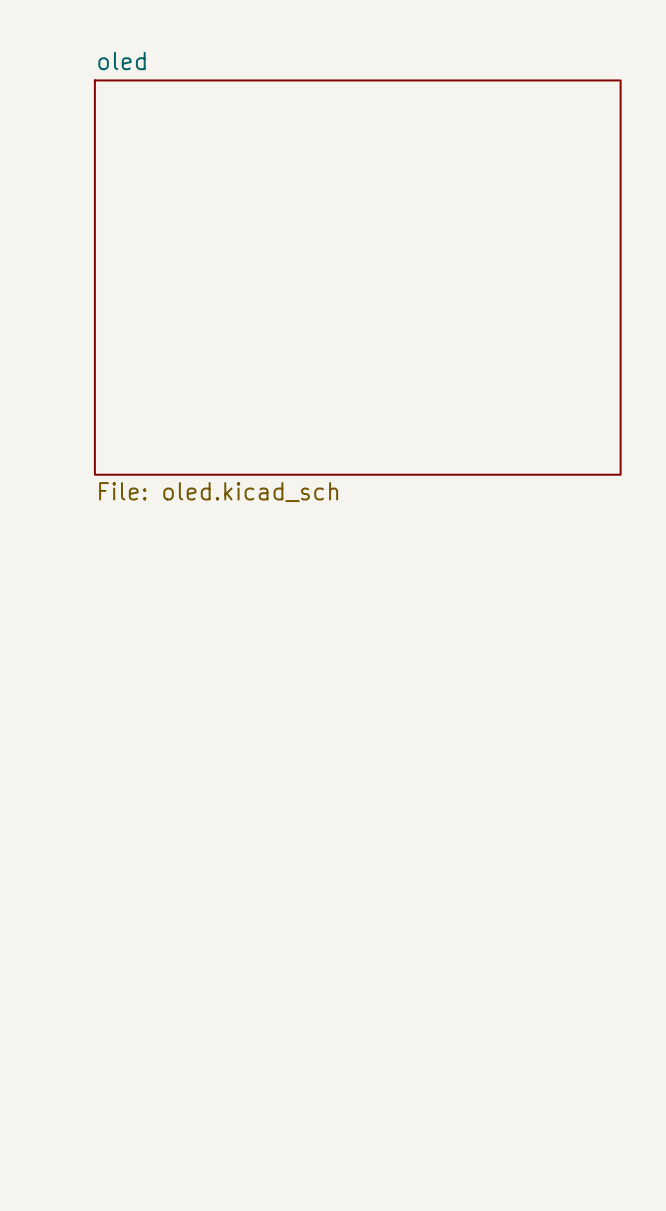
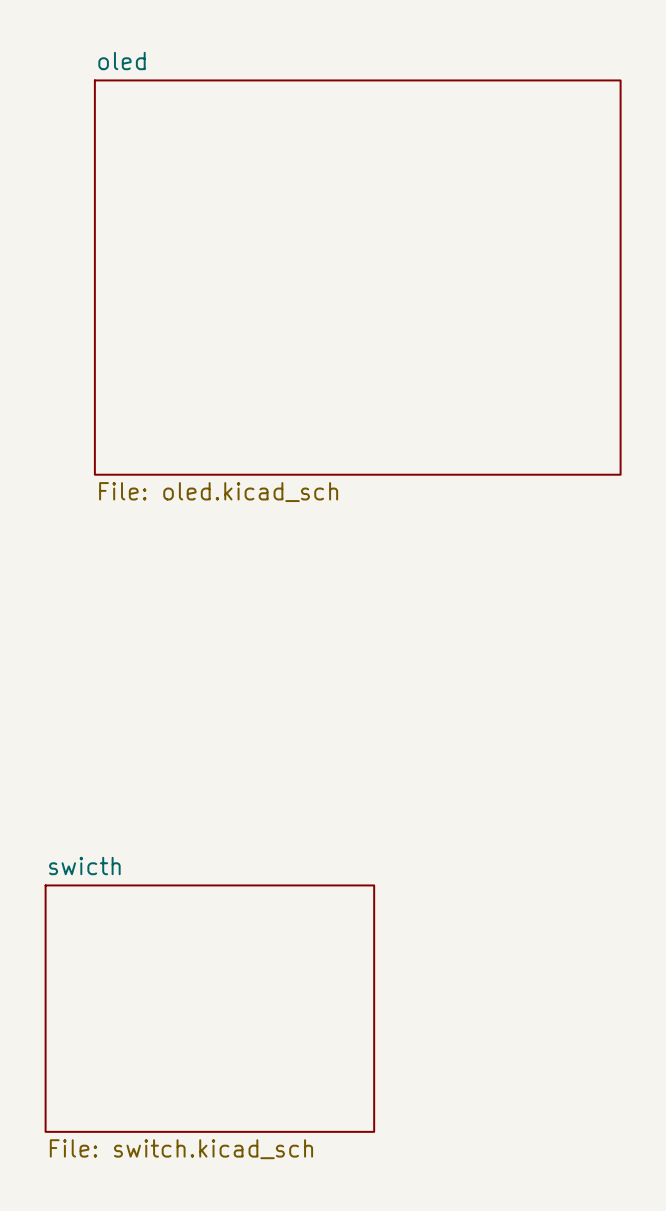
sheet swicth: none -> File: switch.kicad_sch (209, 1008)

